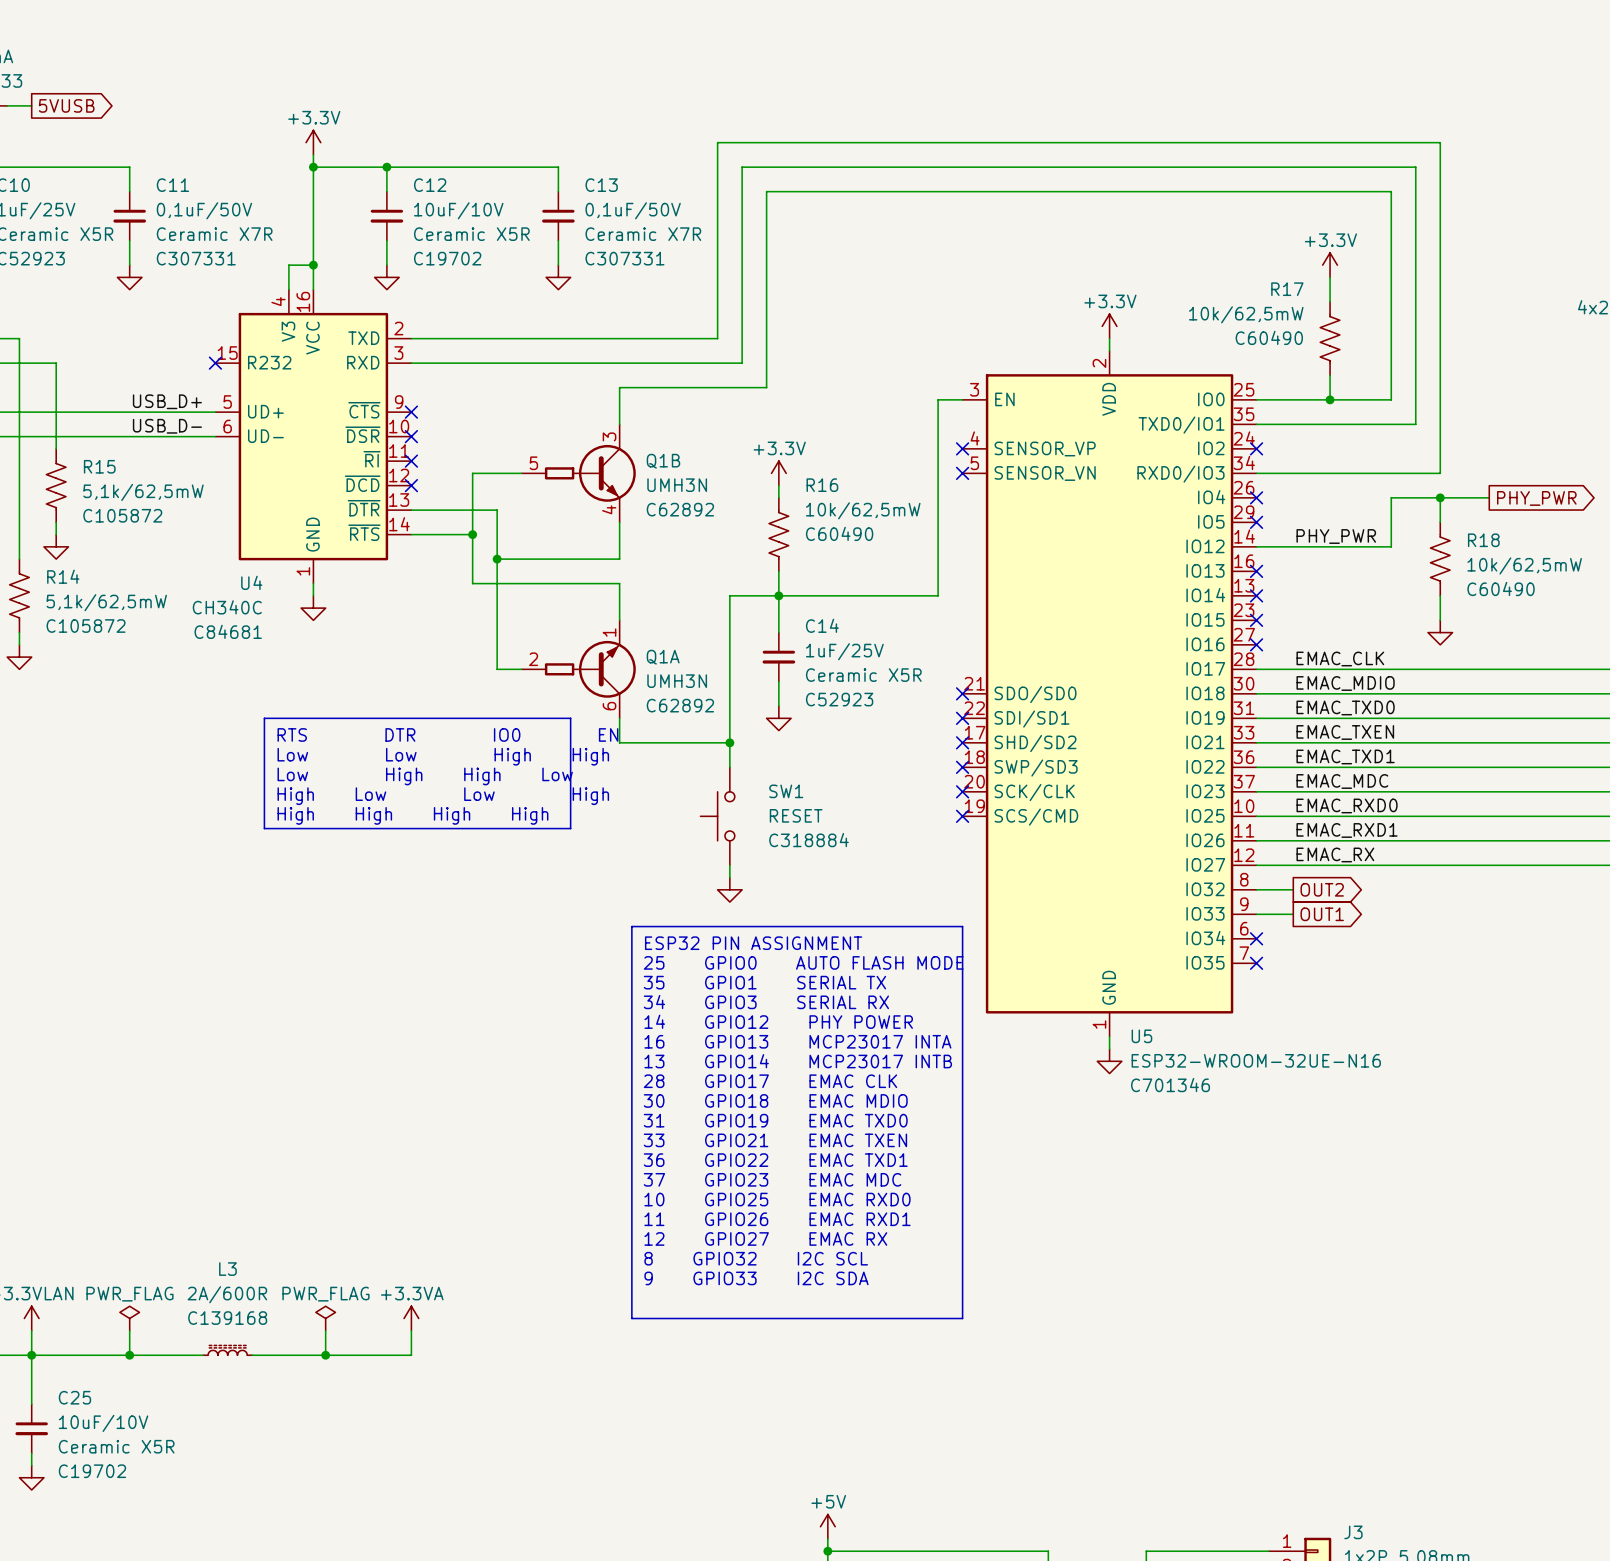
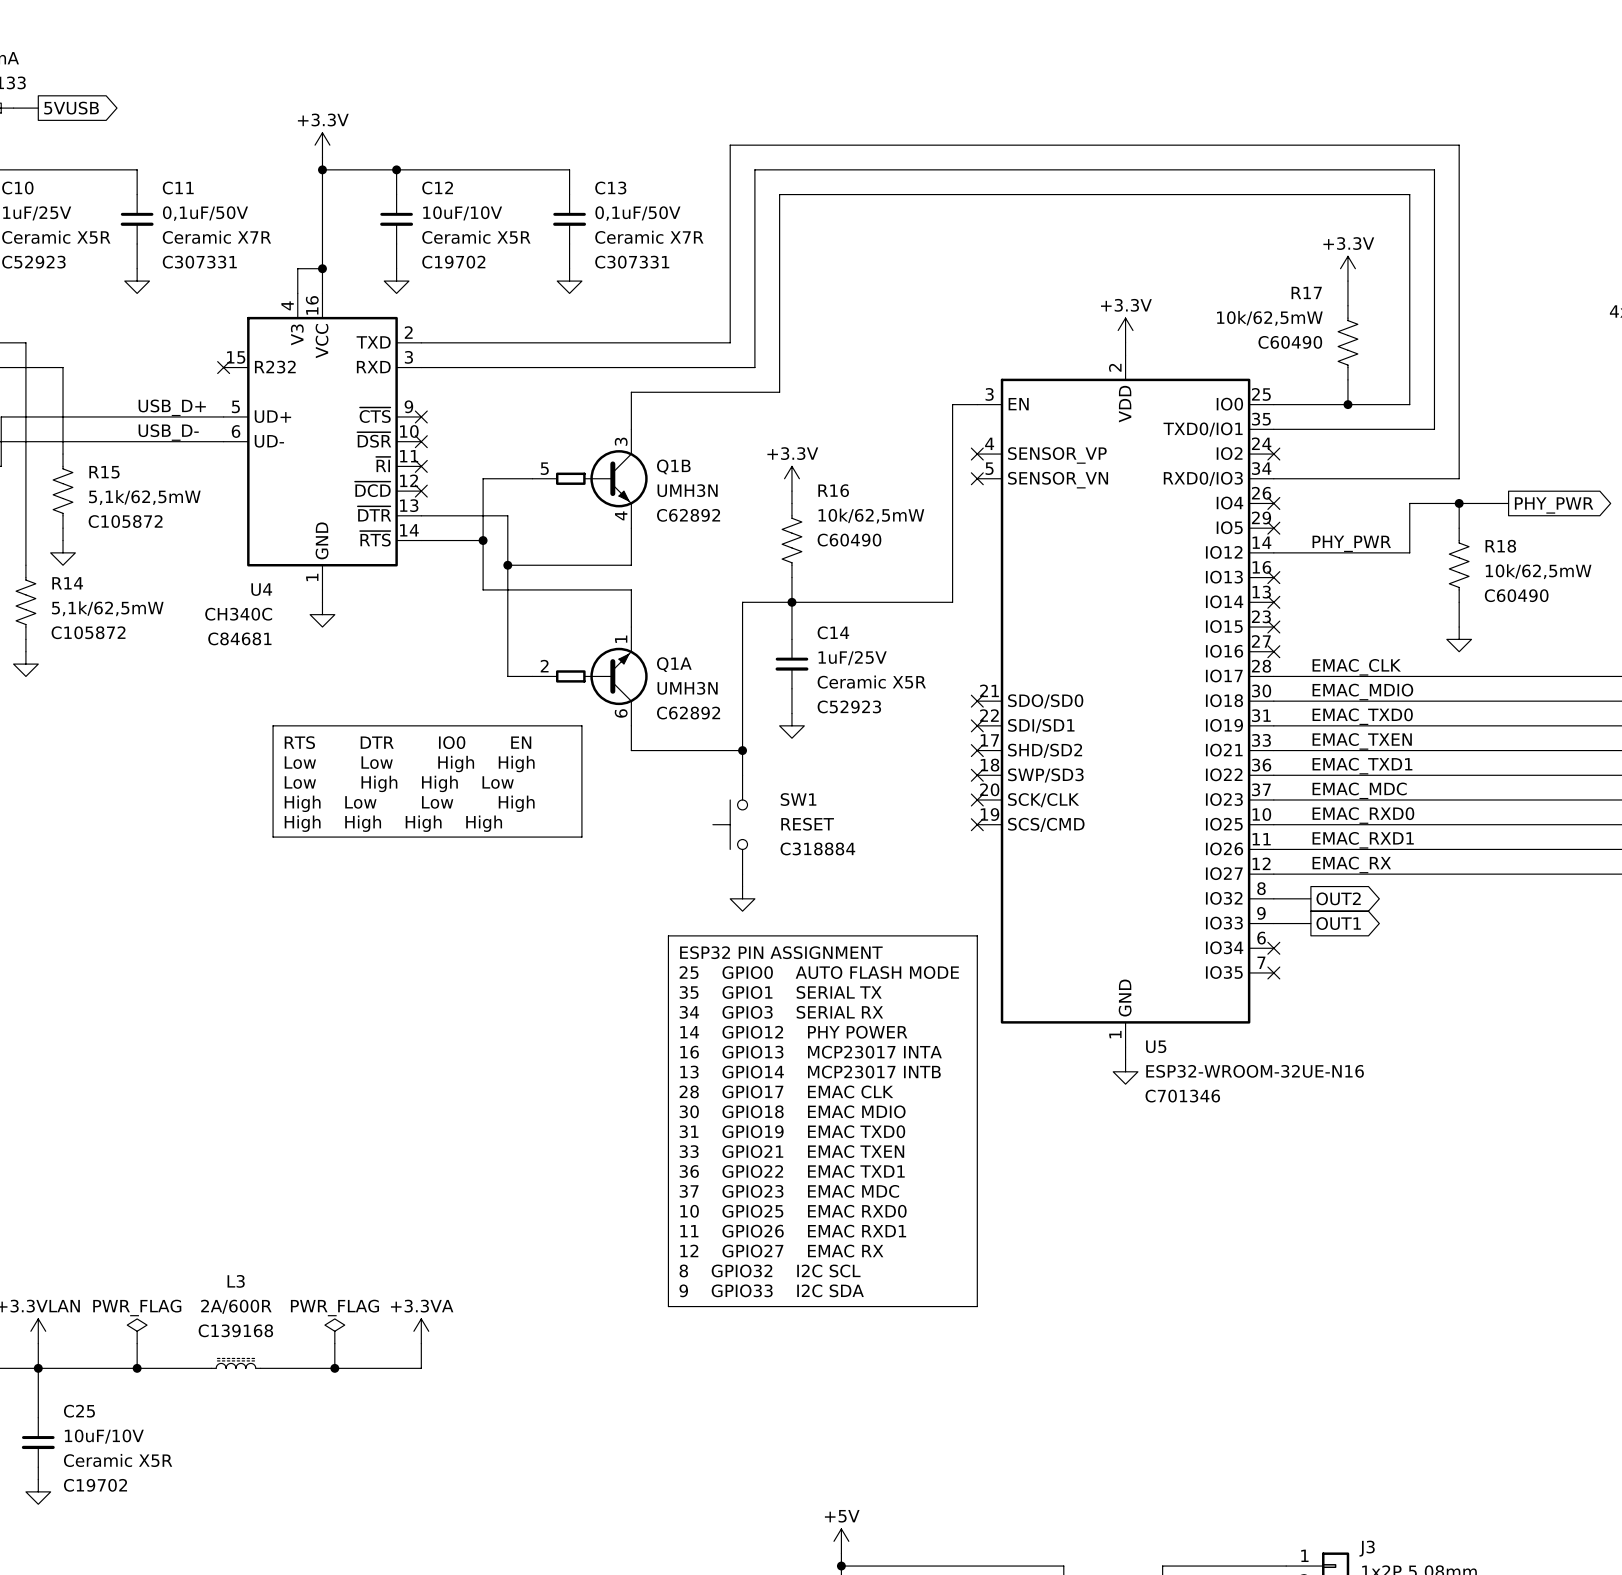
line: (656, 926) (631, 926) (631, 1318) (962, 1318) (962, 1294) -> (668, 935) (668, 1306) (977, 1306)
text position: ESP32 PIN ASSIGNMENT (753, 943) -> ESP32 PIN ASSIGNMENT (781, 952)
text position: 25 GPIO0 AUTO FLASH MODE (803, 962) -> 25 GPIO0 AUTO FLASH MODE (819, 972)
text position: 35 GPIO1 SERIAL TX (764, 982) -> 35 GPIO1 SERIAL TX (780, 992)
text position: 34 GPIO3 SERIAL RX (766, 1002) -> 34 GPIO3 SERIAL RX (781, 1012)
text position: 14 GPIO12 PHY POWER (778, 1021) -> 14 GPIO12 PHY POWER (793, 1032)
text position: 16 GPIO13 MCP23017 INTA (797, 1041) -> 16 GPIO13 MCP23017 INTA (811, 1052)
text position: 13 GPIO14 MCP23017 INTB (798, 1061) -> 13 GPIO14 MCP23017 INTB (810, 1072)
text position: 28 GPIO17 EMAC CLK (770, 1081) -> 28 GPIO17 EMAC CLK (786, 1091)
text position: 30 GPIO18 EMAC MDIO (775, 1100) -> 30 GPIO18 EMAC MDIO (792, 1111)
text position: 31 GPIO19 EMAC TXD0 (775, 1120) -> 31 GPIO19 EMAC TXD0 (792, 1131)
text position: 33 GPIO21 EMAC TXEN (775, 1140) -> 33 GPIO21 EMAC TXEN (791, 1151)
text position: 36 GPIO22 EMAC TXD1 (775, 1160) -> 36 GPIO22 EMAC TXD1 (792, 1171)
text position: 37 GPIO23 EMAC MDC (772, 1179) -> 37 GPIO23 EMAC MDC (789, 1191)
text position: 10 GPIO25 EMAC RXD0 (777, 1199) -> 10 GPIO25 EMAC RXD0 (793, 1211)
text position: 11 GPIO26 EMAC RXD1 (777, 1219) -> 11 GPIO26 EMAC RXD1 (793, 1231)
text position: 12 GPIO27 EMAC RX (765, 1238) -> 12 GPIO27 EMAC RX (781, 1251)
text position: 8 GPIO32 I2C SCL (756, 1258) -> 8 GPIO32 I2C SCL (770, 1270)
text position: 9 GPIO33 I2C SDA (756, 1278) -> 9 GPIO33 I2C SDA (771, 1290)

